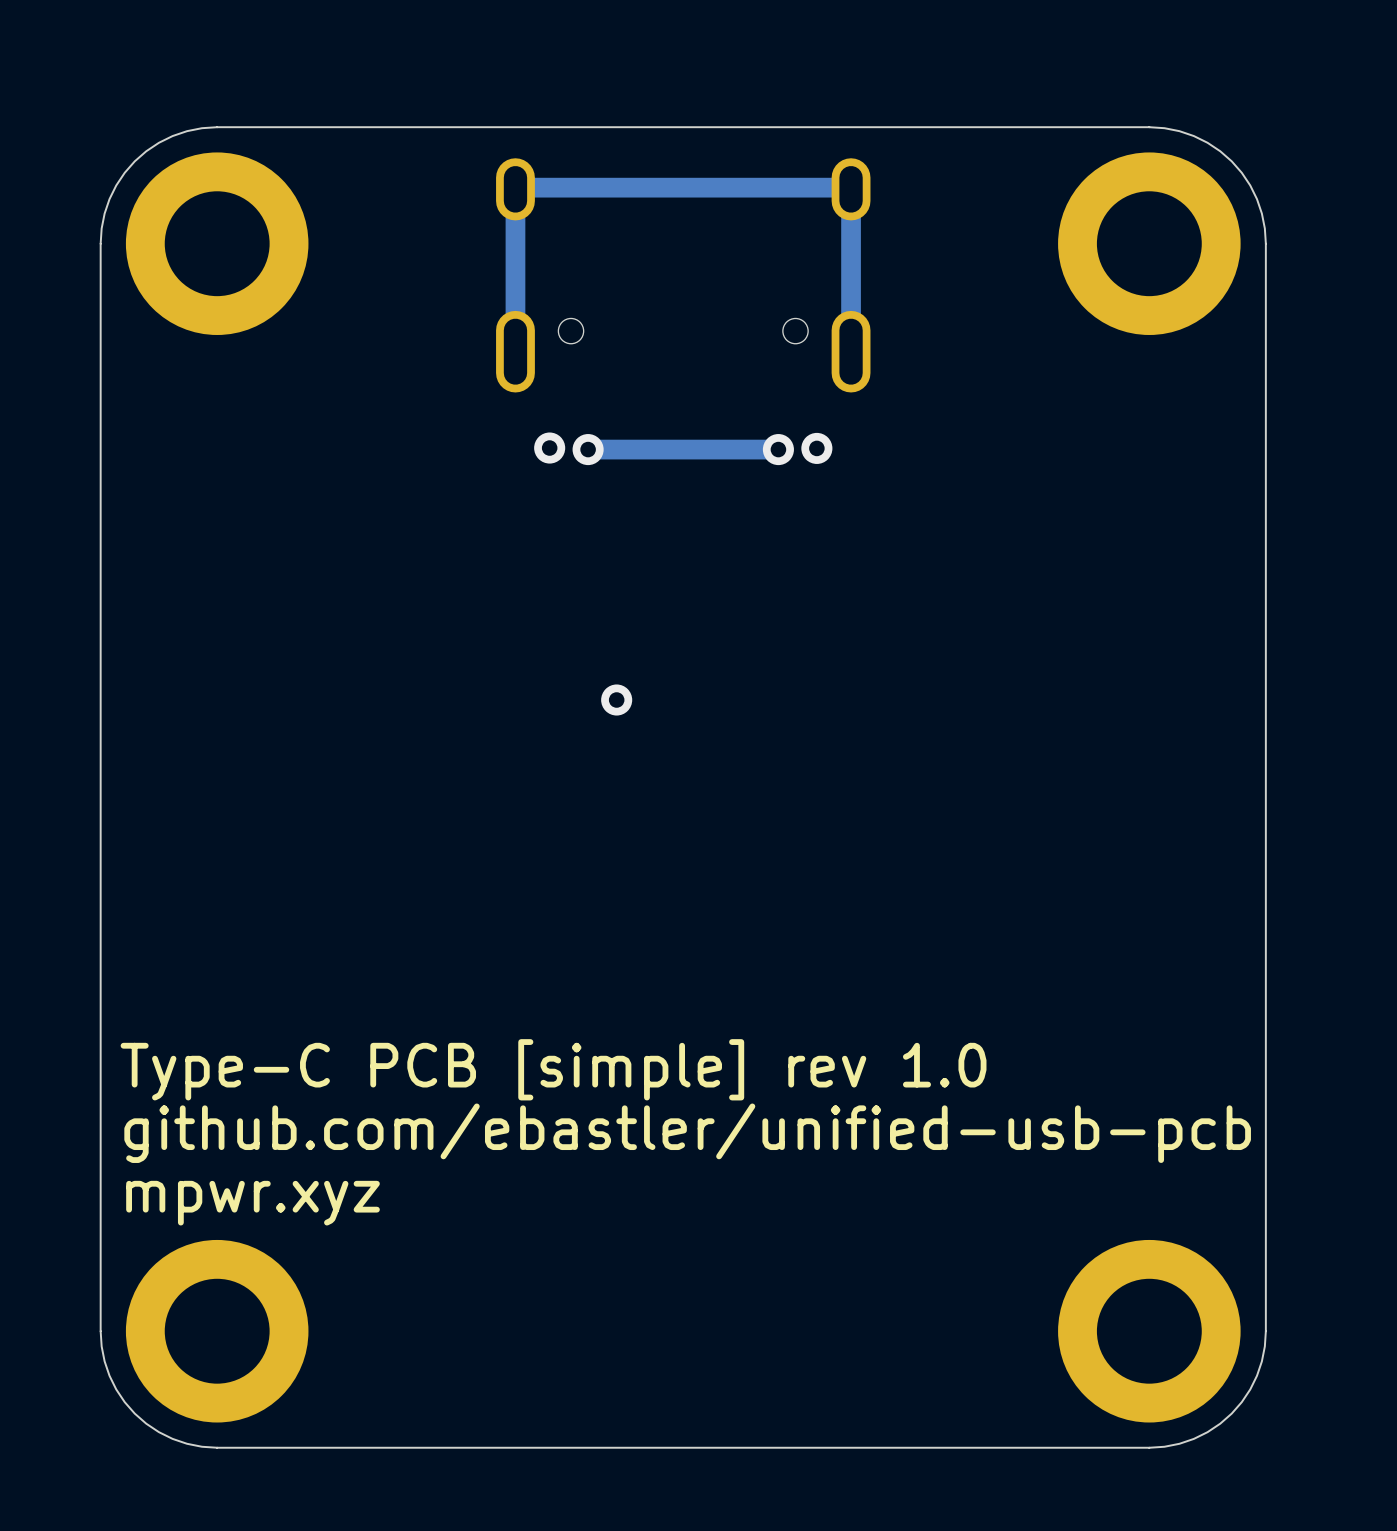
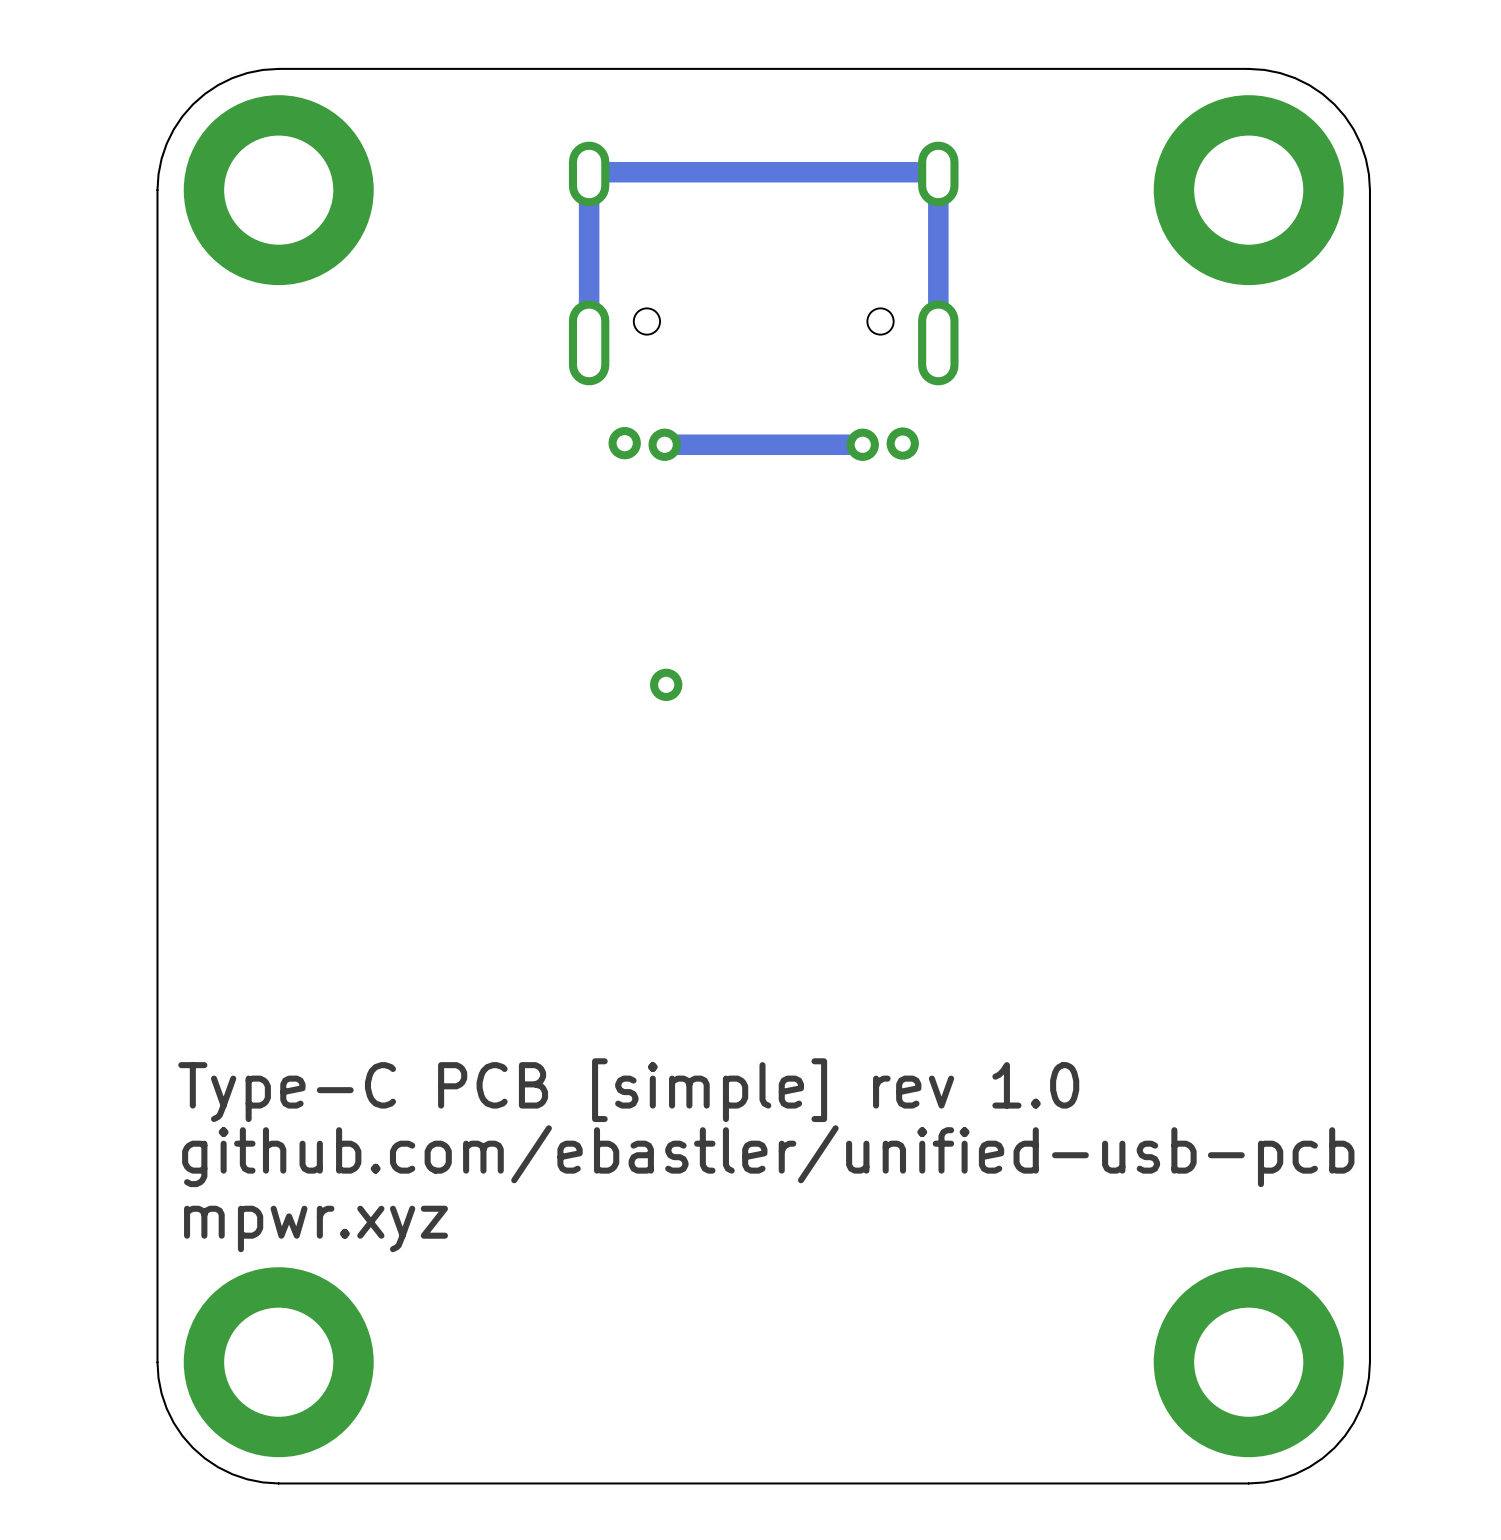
part position: (217, 243) -> (278, 190)
part position: (1149, 243) -> (1248, 190)
board edge: (1265, 243) (1261, 213) (1256, 199) (1241, 172) (1231, 161) (1220, 151) (1193, 136) (1164, 128) (1149, 127) (201, 128) (172, 136) (146, 151) (134, 161) (124, 172) (109, 199) (104, 213) (100, 243) -> (1369, 230) (1369, 190) (1365, 158) (1360, 143) (1344, 116) (1322, 93) (1295, 78) (1264, 69) (1248, 68) (262, 69) (232, 78) (204, 93) (192, 104) (173, 129) (161, 158) (158, 174) (157, 230)
via position: (616, 700) -> (666, 684)

